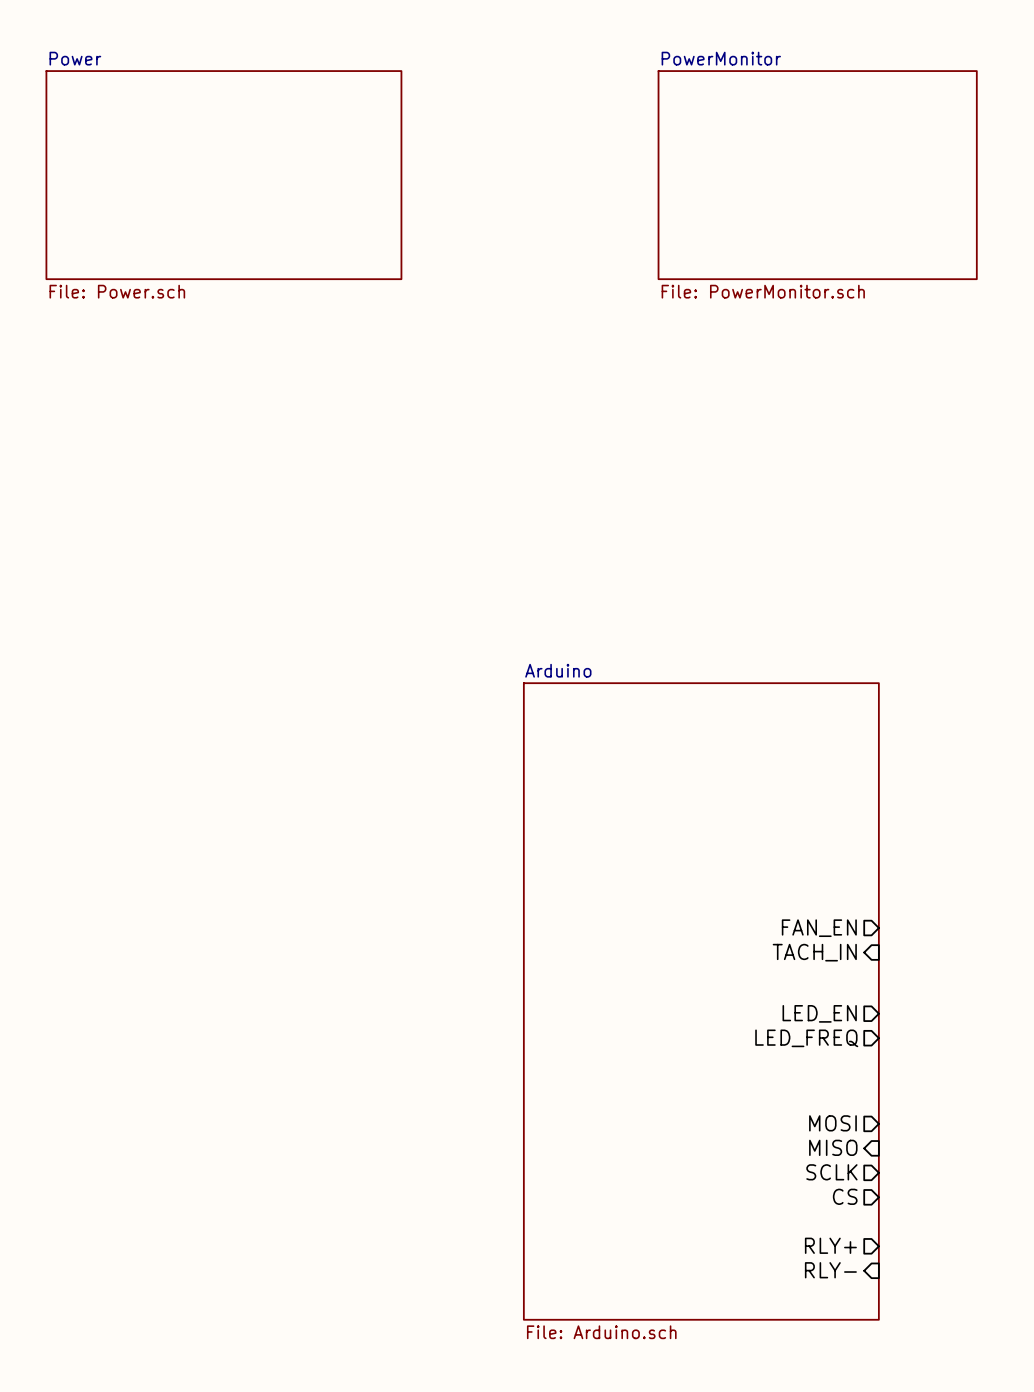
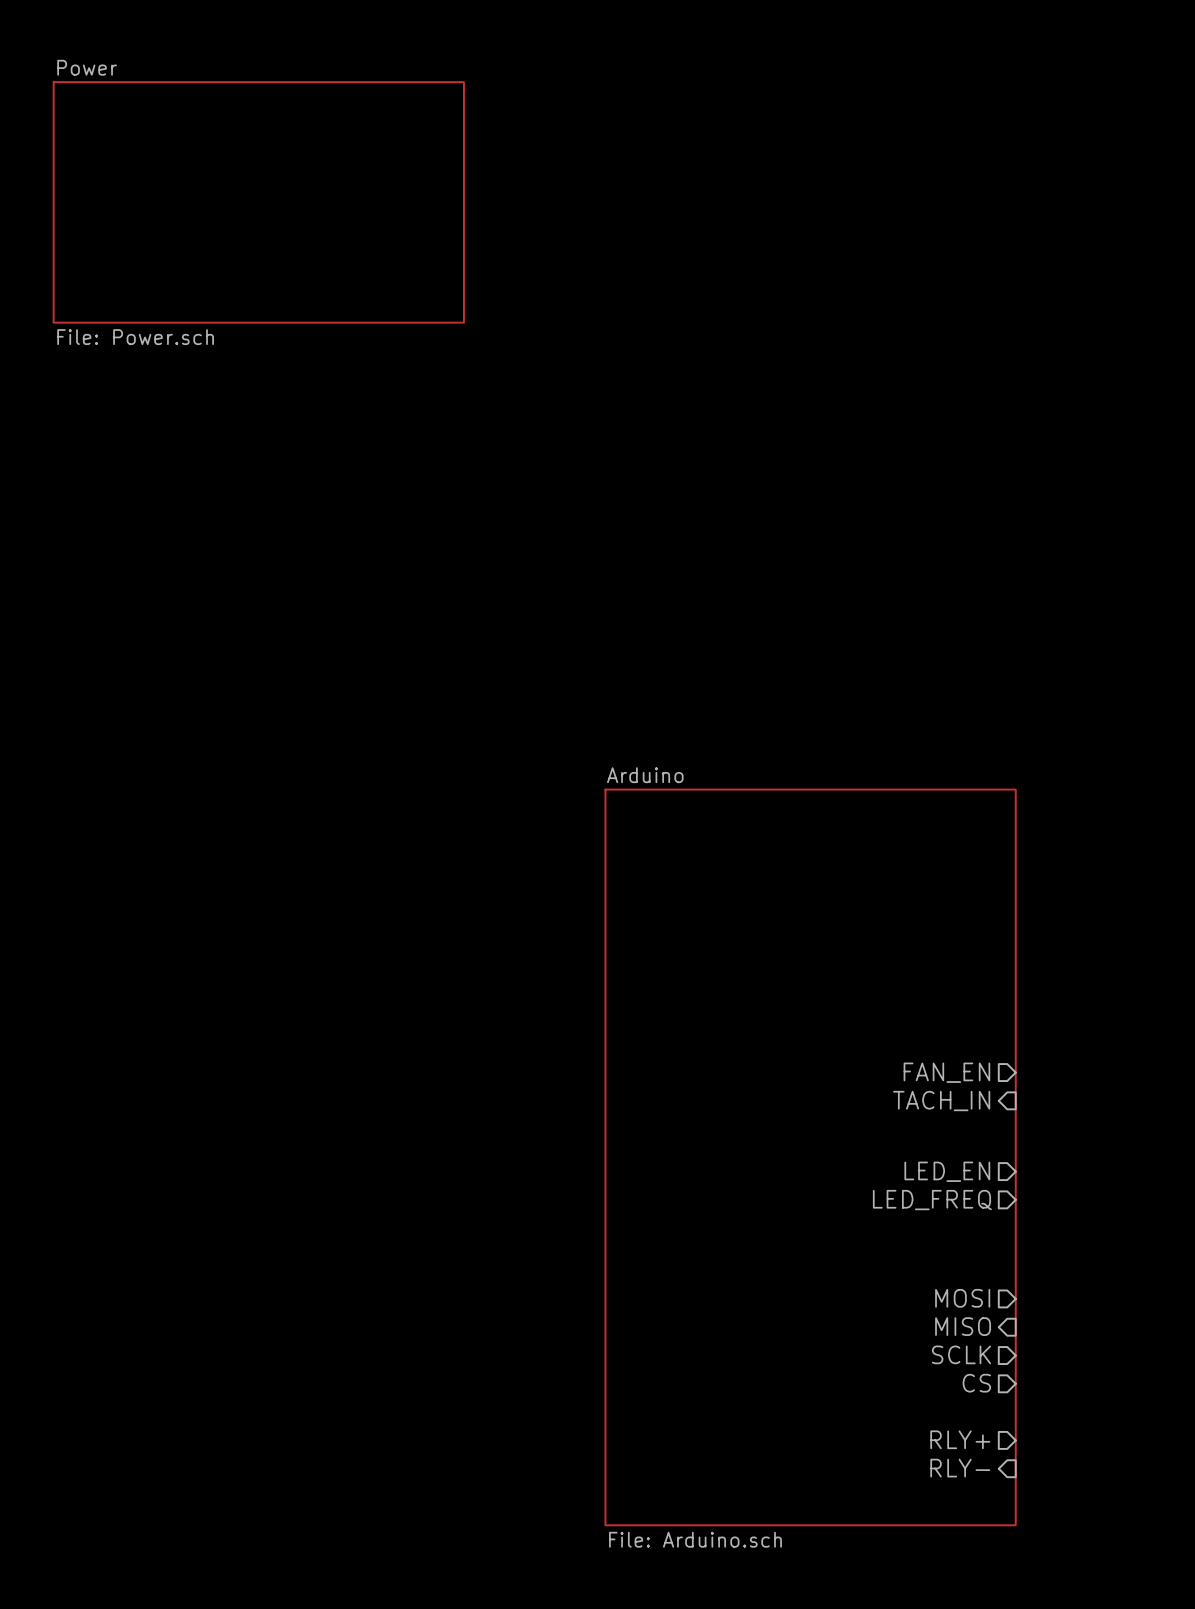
sheet PowerMonitor: File: PowerMonitor.sch (817, 175) -> none

